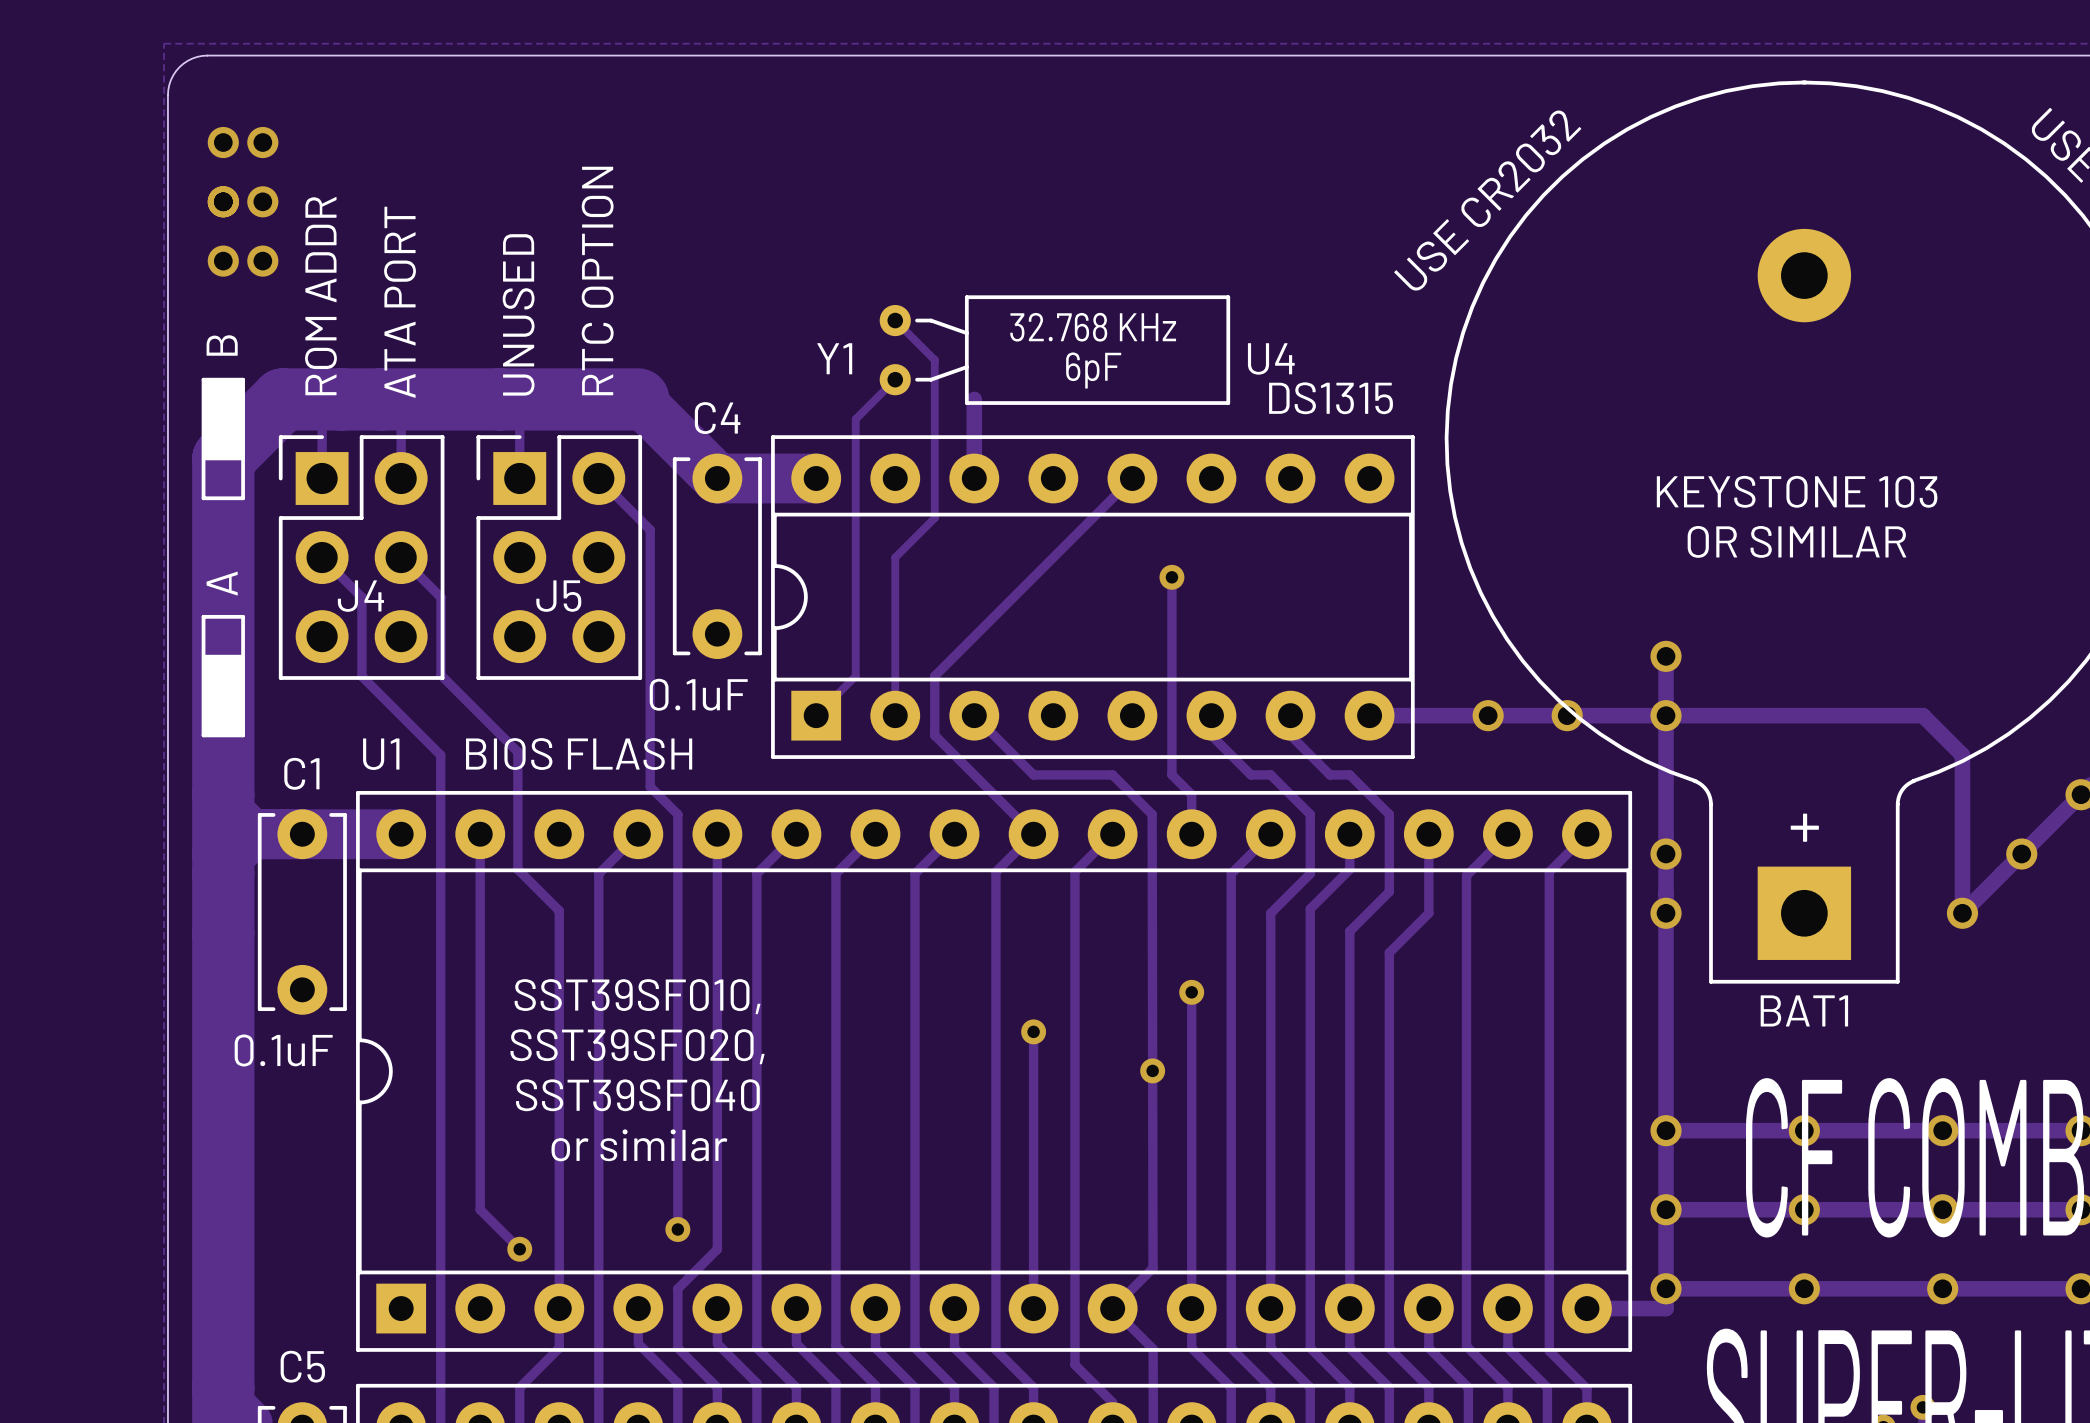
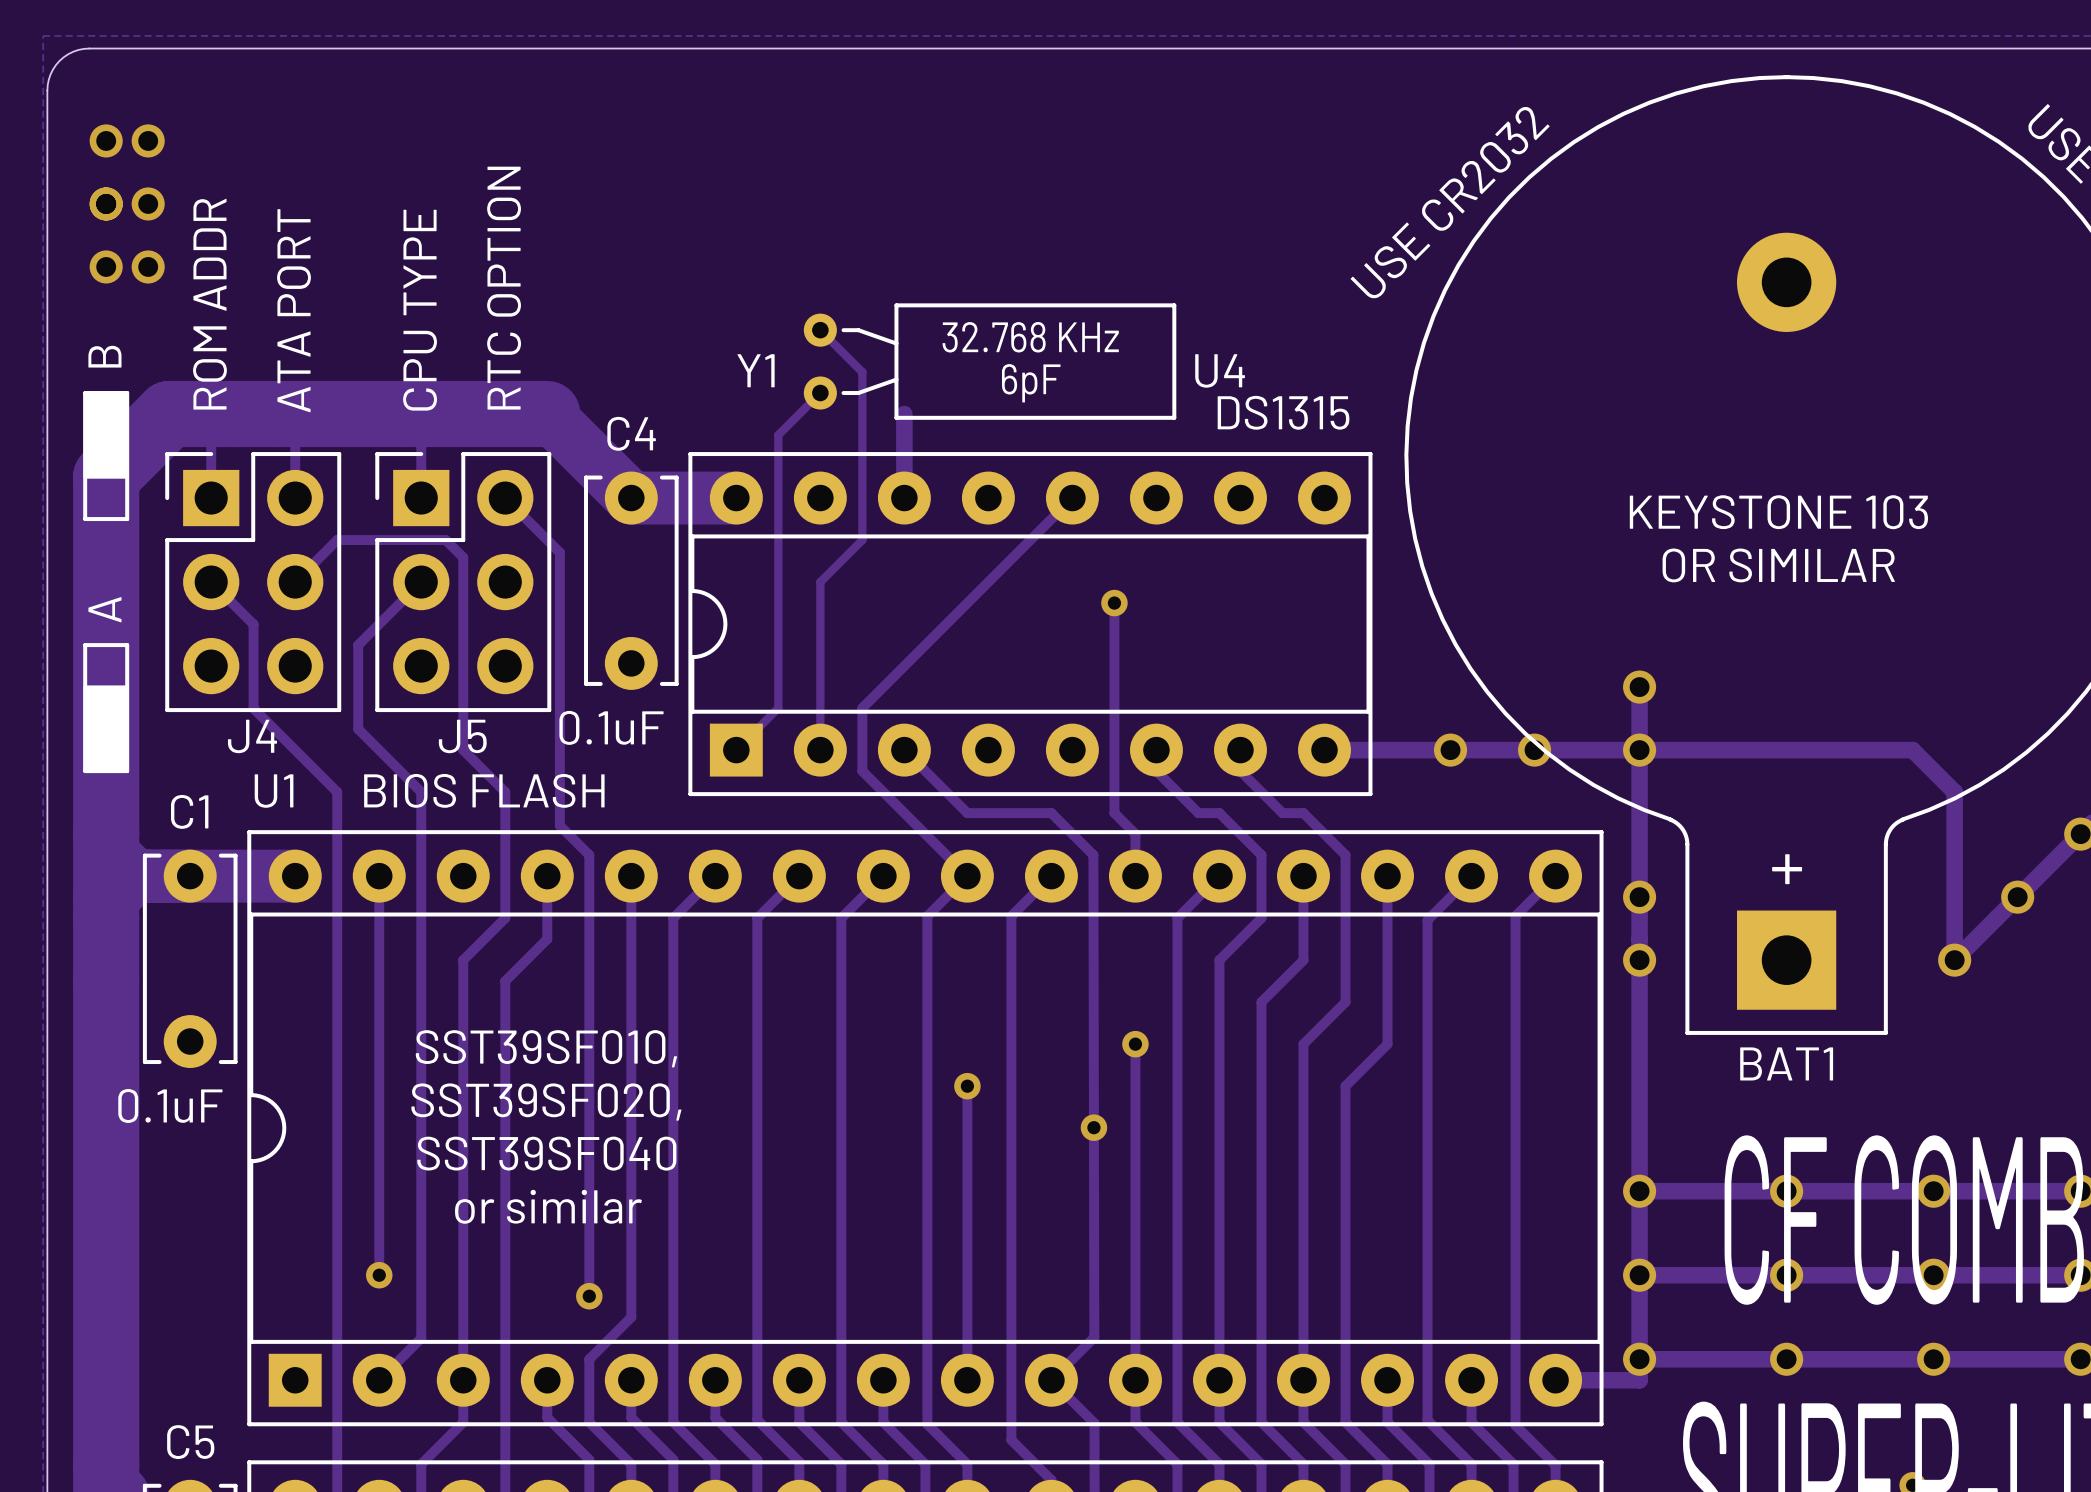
text: UNUSED (518, 314) -> CPU TYPE (420, 310)
track: (401, 557) (441, 597) (441, 675) (517, 752) (517, 869) (559, 910) (559, 913) -> (295, 582) (337, 540) (445, 540) (463, 557) (463, 750) (505, 792) (505, 918) (463, 960)
track: none -> (421, 582) (358, 645) (358, 729) (421, 792) (421, 1338) (379, 1380)
J4 name position: J4 (360, 596) -> J4 (252, 736)
J5 name position: J5 (558, 596) -> J5 (462, 736)
track: (638, 834) (598, 873) (598, 933) -> (547, 876) (547, 939) (505, 981)
track: (1349, 869) (1310, 908) (1310, 952) -> (1303, 913) (1303, 960) (1261, 1002)
track: (1389, 891) (1349, 931) (1349, 992) -> (1345, 937) (1345, 1002) (1303, 1044)
track: (1428, 913) (1389, 952) (1389, 1031) -> (1387, 960) (1387, 1044) (1345, 1086)
track: (480, 1209) (519, 1249) -> none
via position: (519, 1249) -> (379, 1275)

